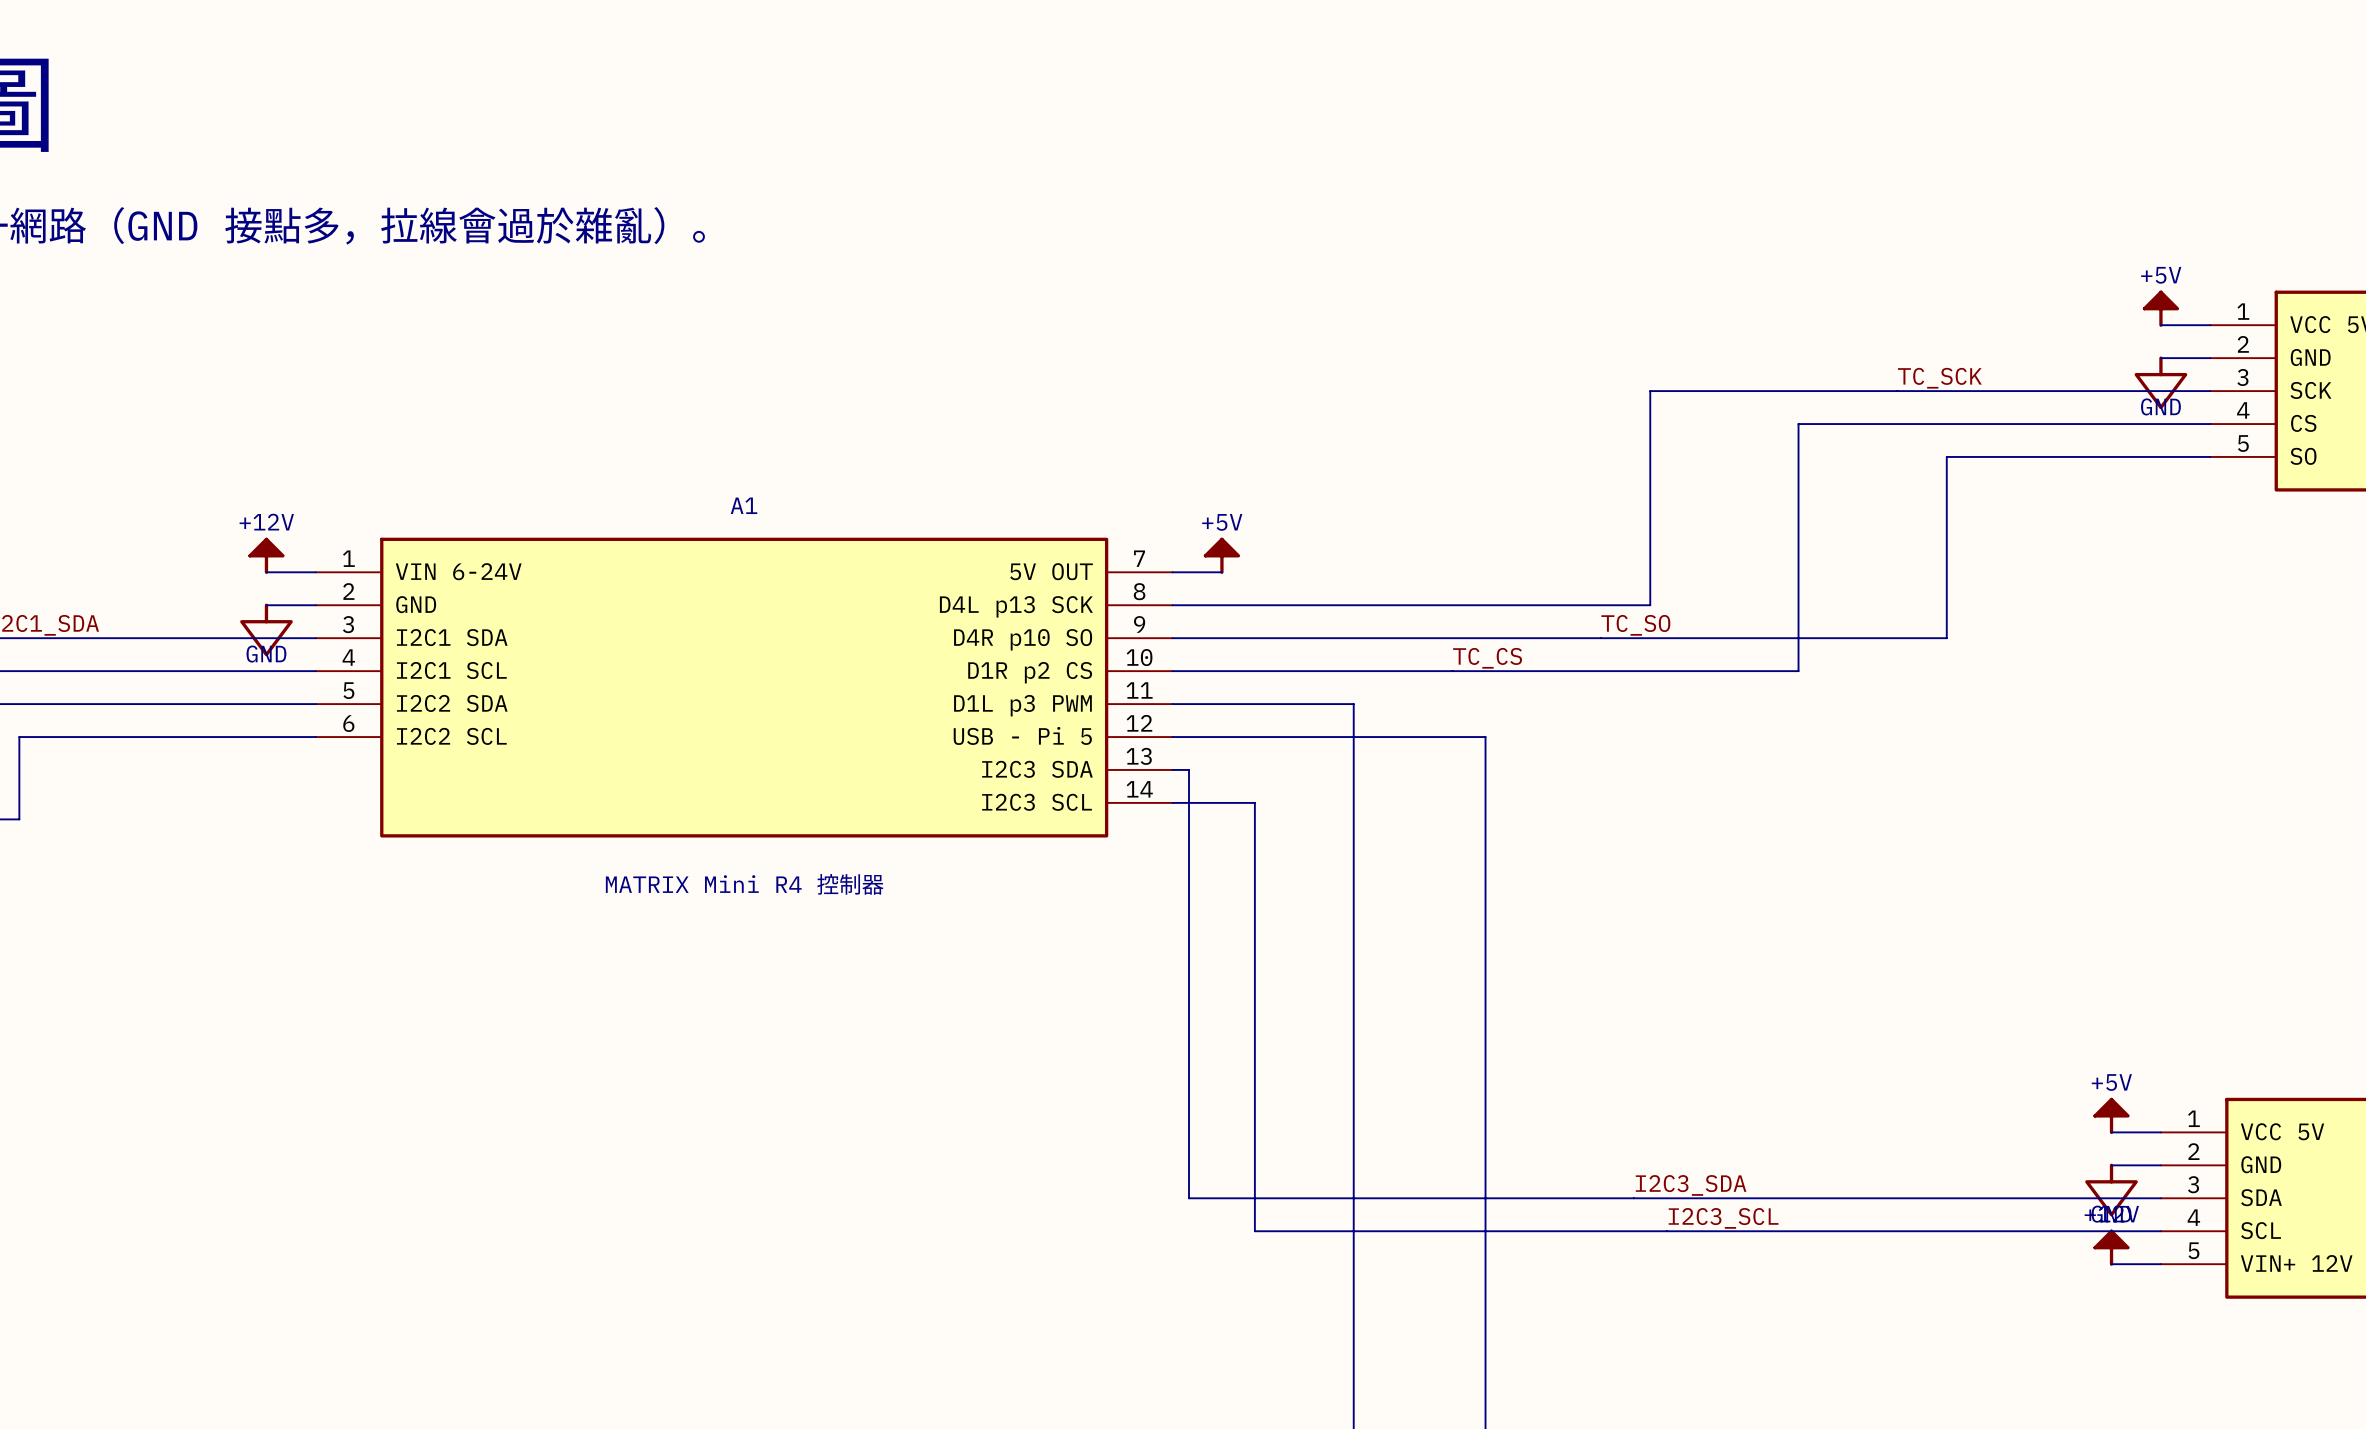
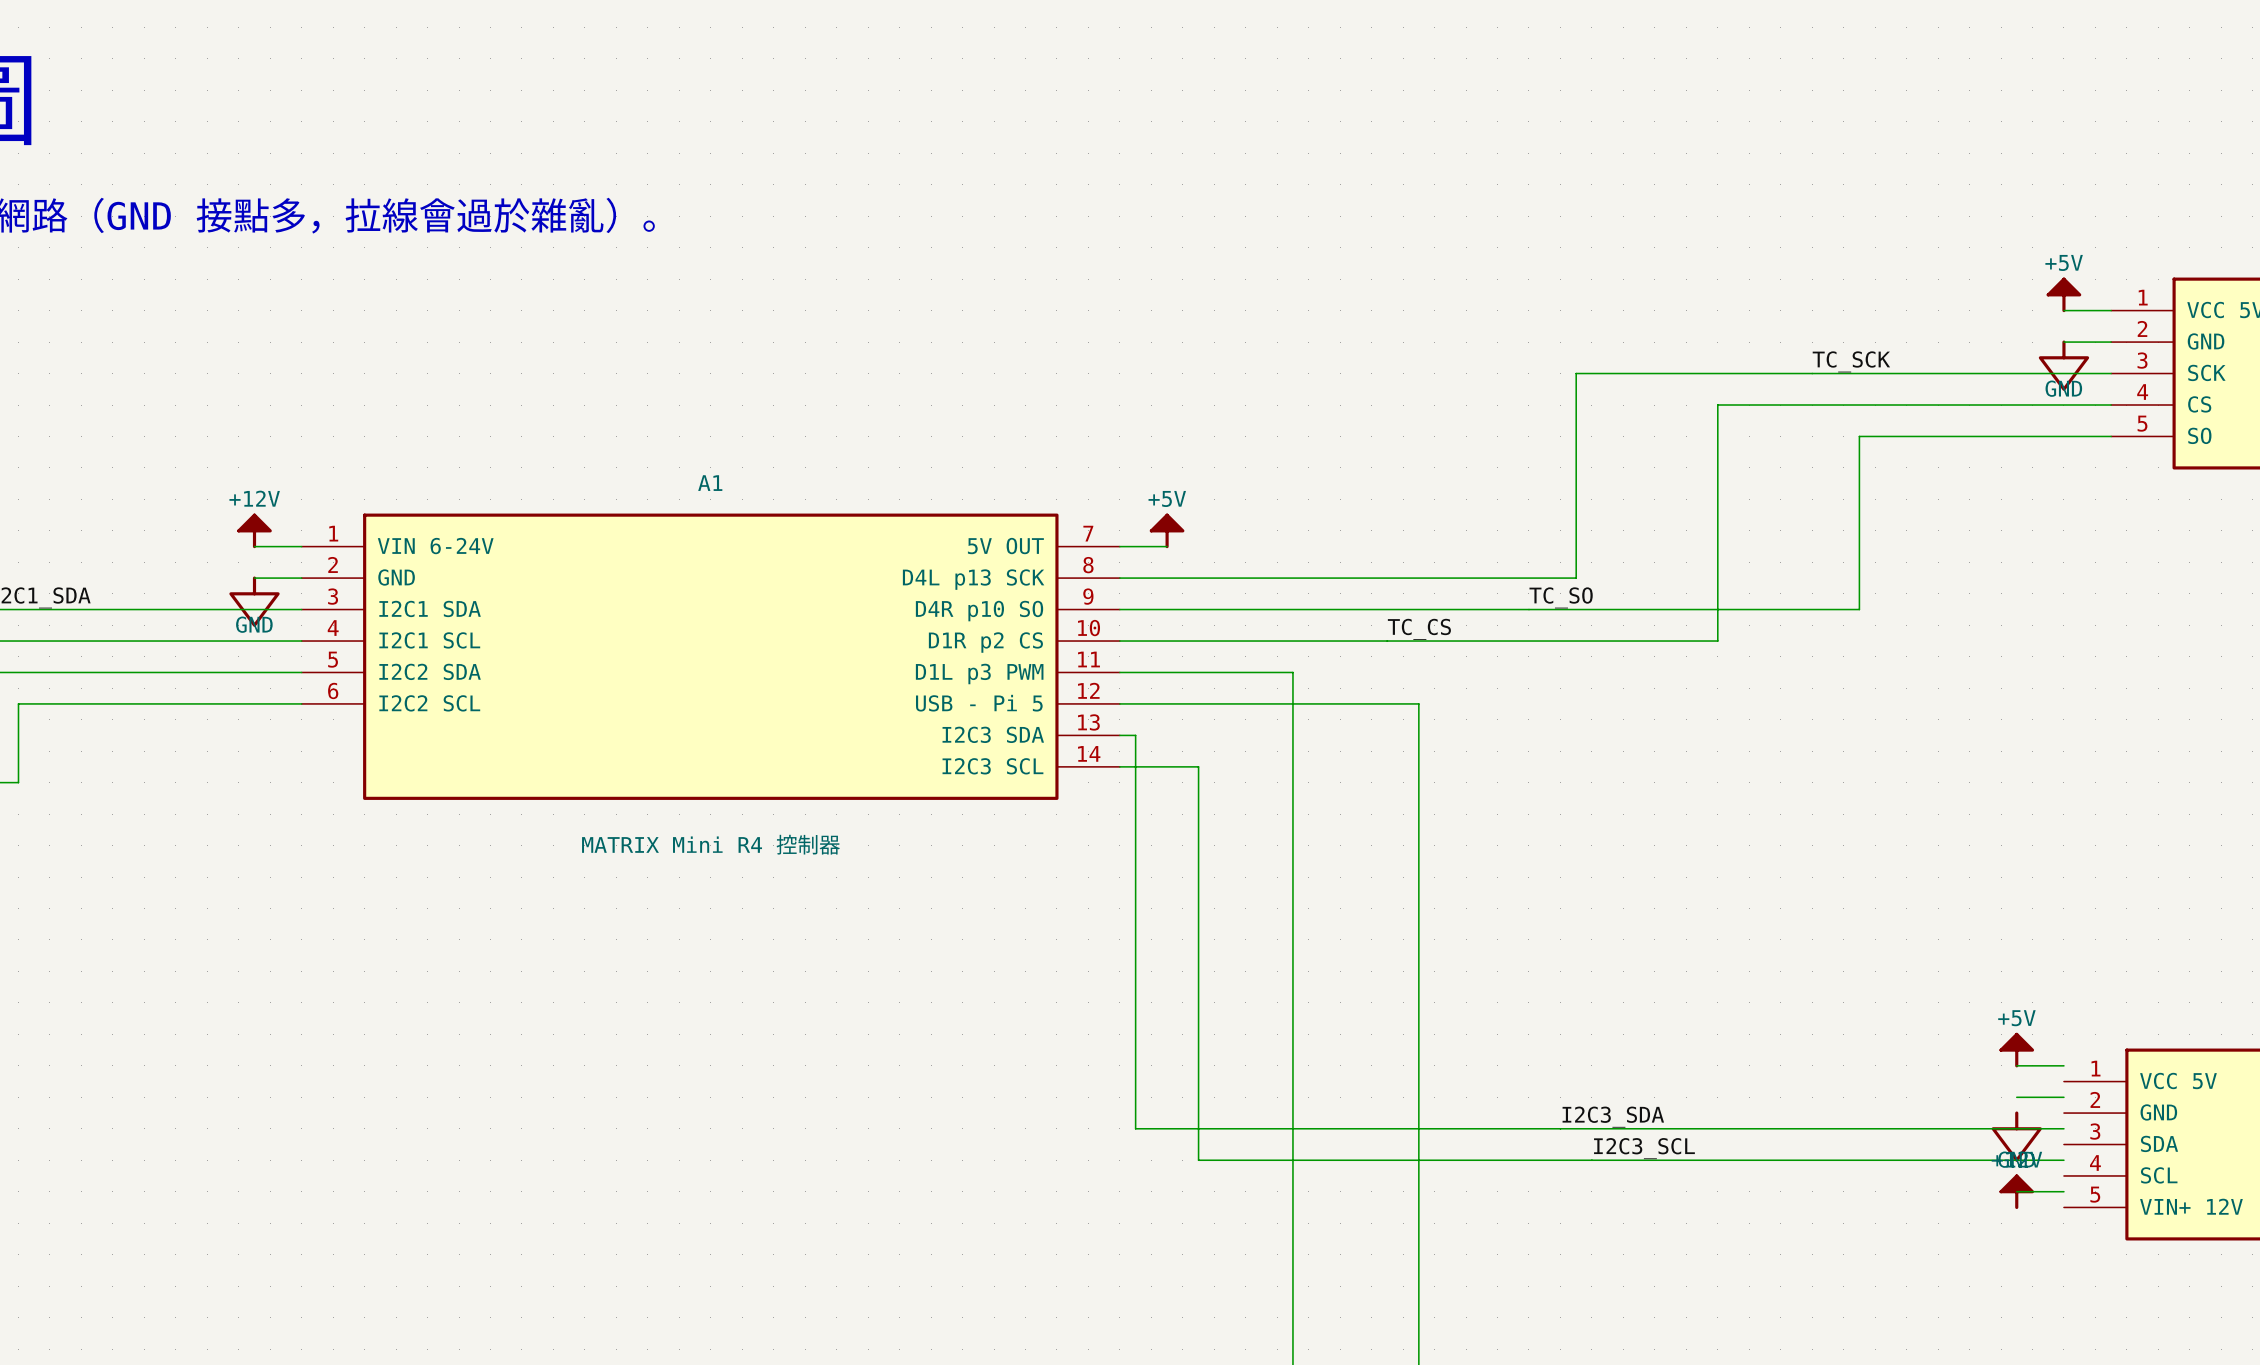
power symbol position: +5V (2111, 1115) -> +5V (2016, 1050)
wire: (2111, 1132) (2160, 1132) -> (2016, 1065) (2063, 1065)
wire: (2111, 1165) (2160, 1165) -> (2016, 1097) (2063, 1097)
wire: (1188, 1181) (1188, 1198) (2160, 1198) -> (1135, 1128) (2063, 1128)
label position: I2C3_SDA (1691, 1185) -> I2C3_SDA (1613, 1117)
wire: (1254, 1214) (1254, 1231) (2160, 1231) -> (1198, 1160) (2063, 1160)
label position: I2C3_SCL (1723, 1218) -> I2C3_SCL (1644, 1148)
wire: (2111, 1264) (2160, 1264) -> (2016, 1191) (2063, 1191)

